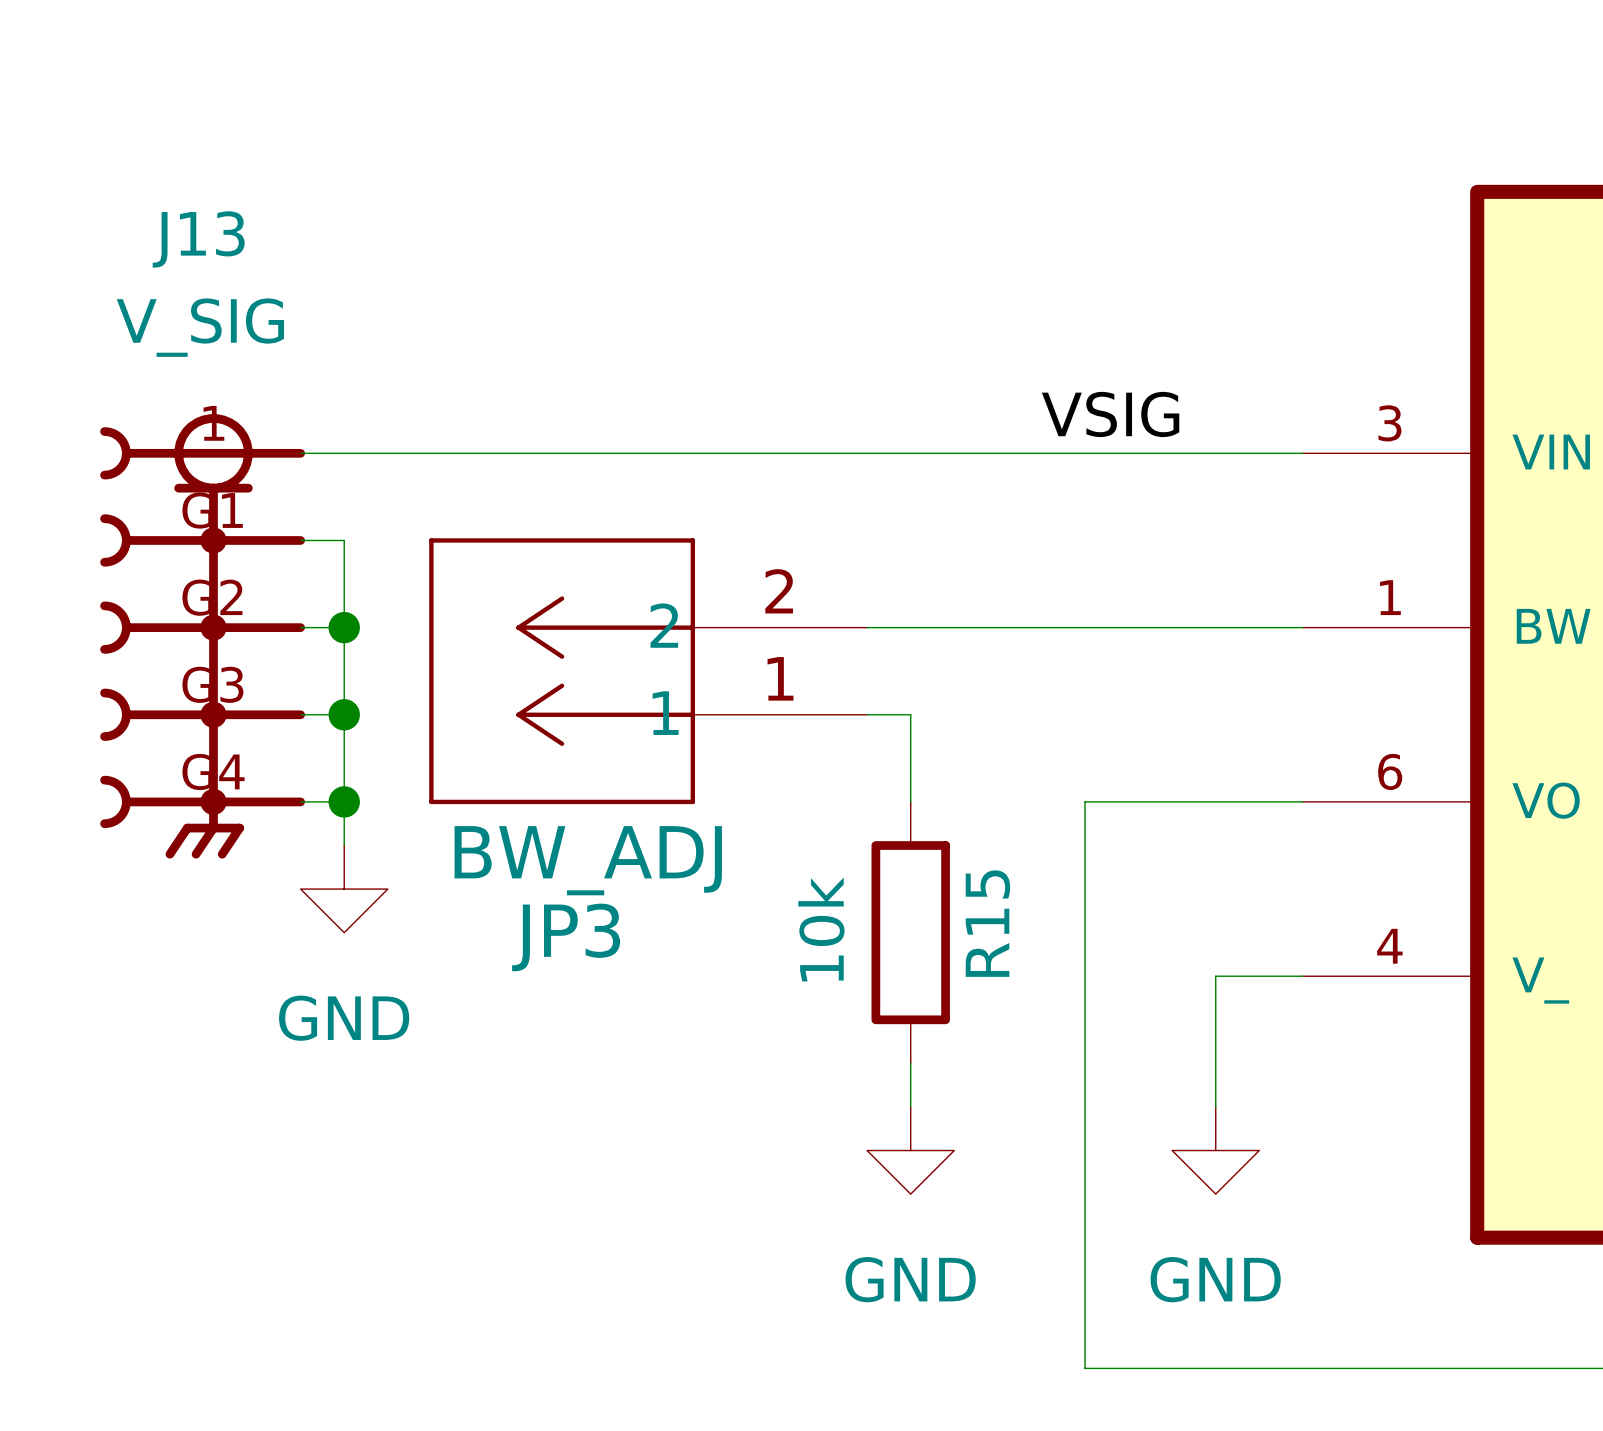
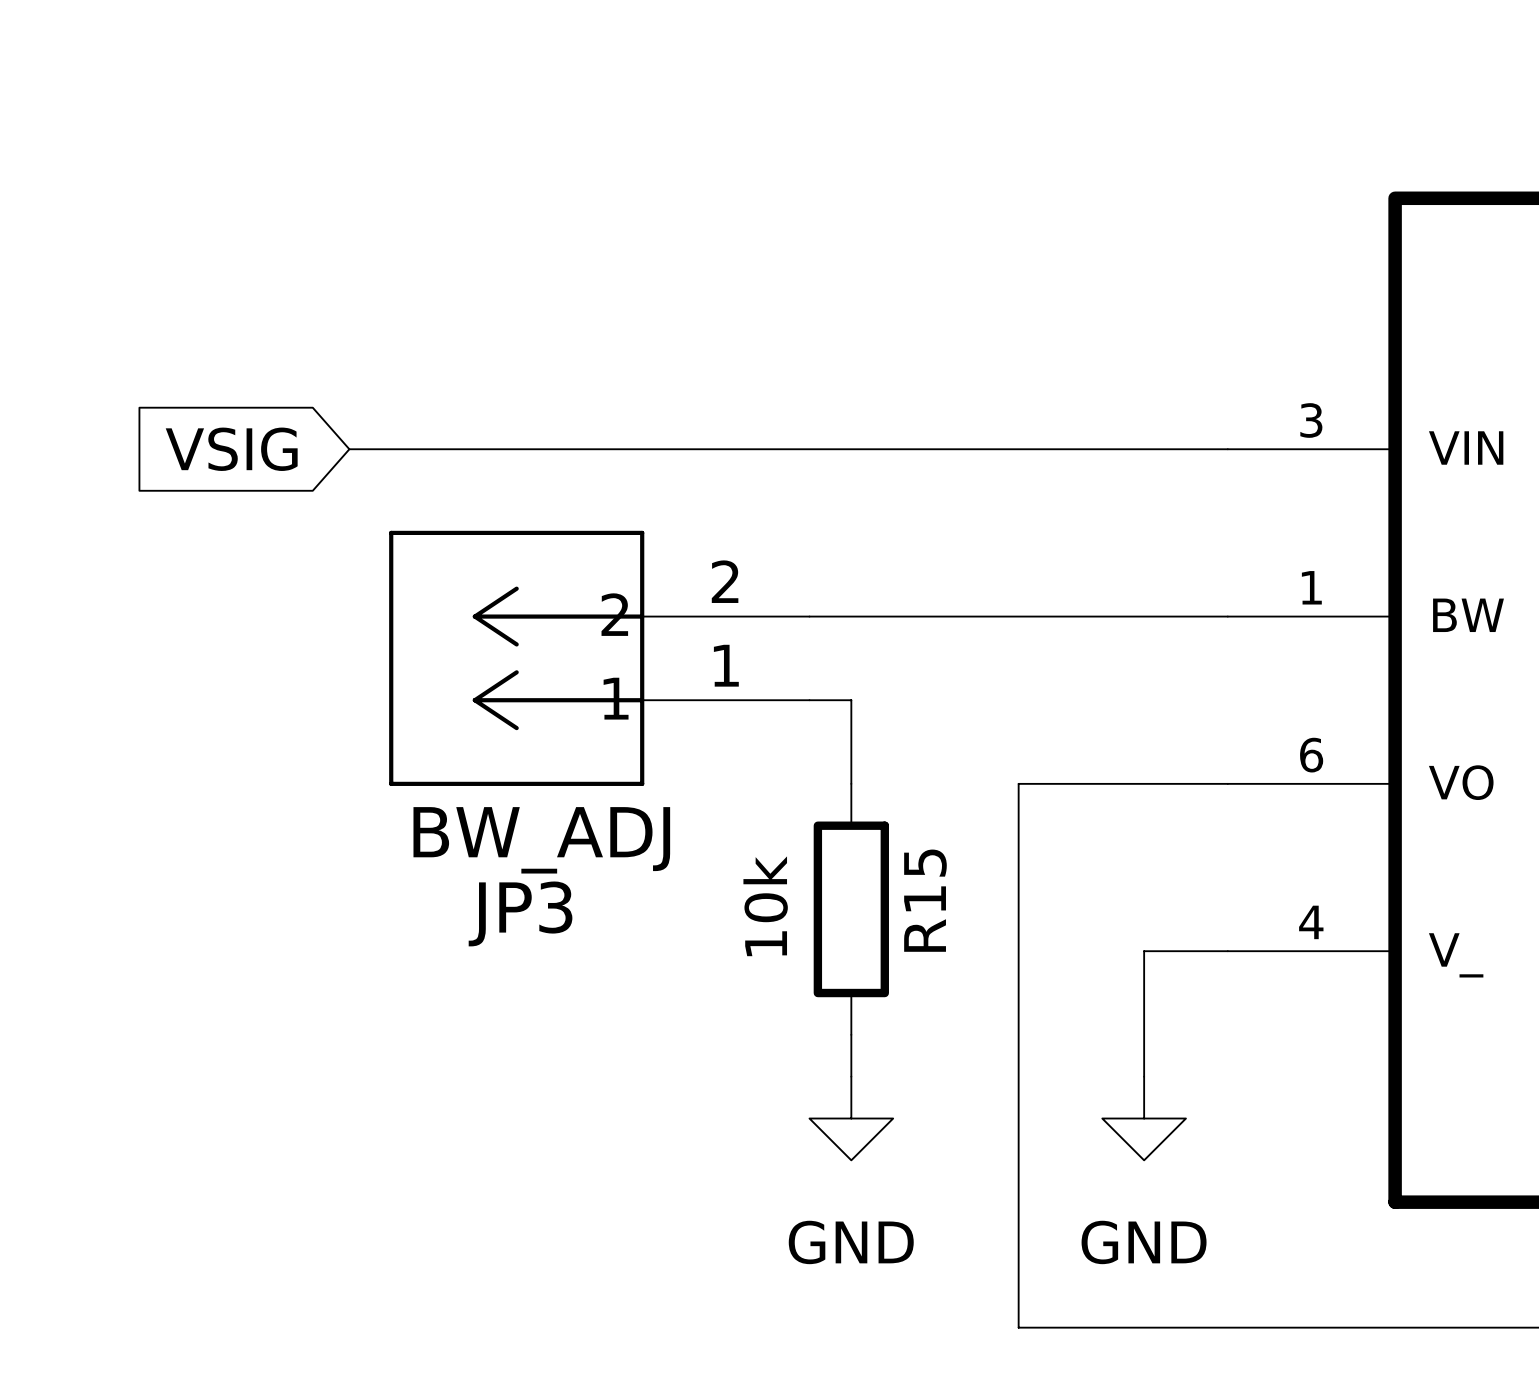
label: VSIG (1110, 414) -> none
global label: none -> VSIG (231, 449)
wire: (300, 453) (387, 453) -> none
wire: (300, 540) (344, 540) (344, 845) -> none
wire: (300, 627) (344, 627) -> none
junction: (344, 627) -> none
J13: V_SIG (202, 636) -> none
wire: (300, 714) (344, 714) -> none
junction: (344, 714) -> none
wire: (300, 801) (344, 801) -> none
junction: (344, 801) -> none
power symbol: GND (344, 889) -> none

